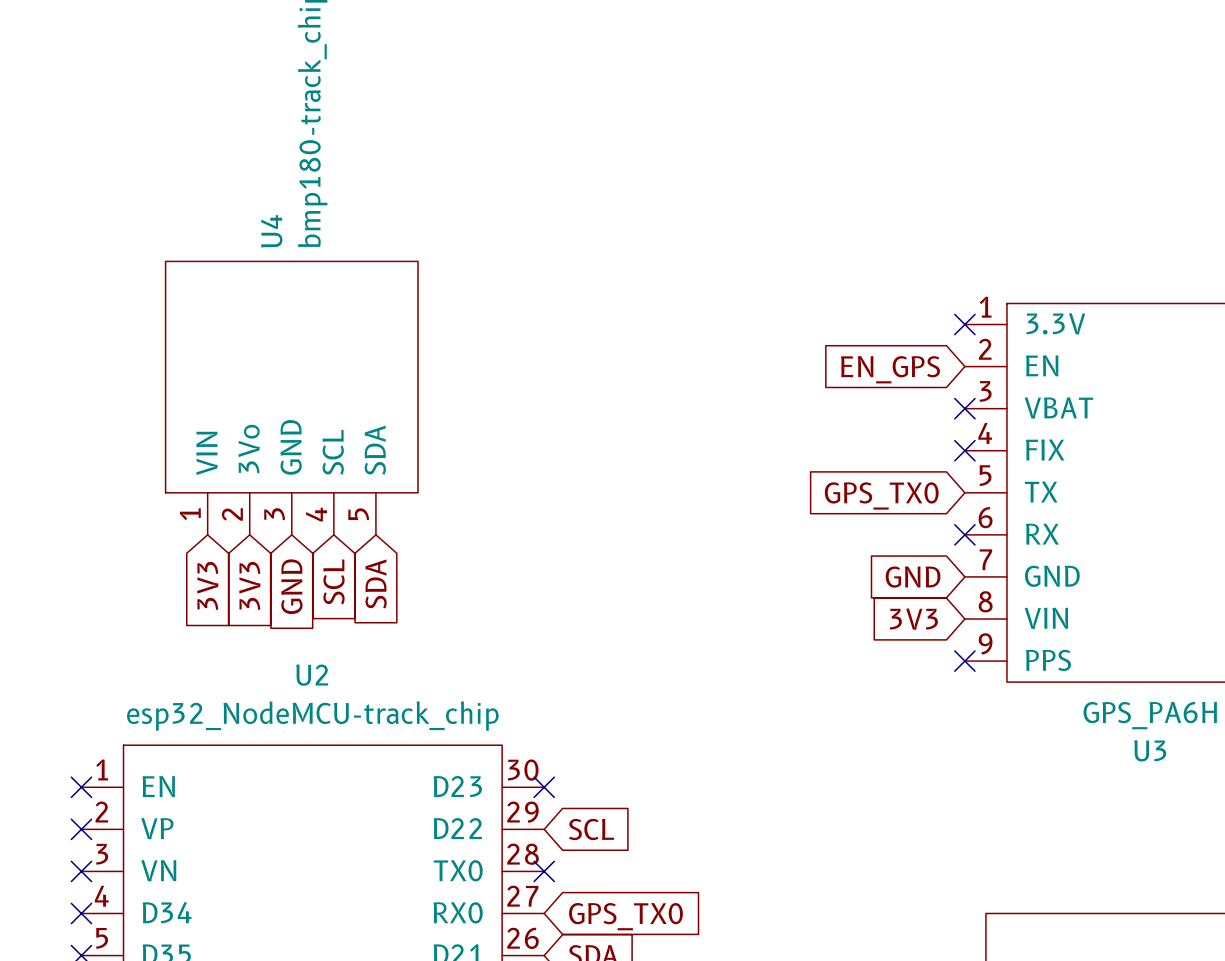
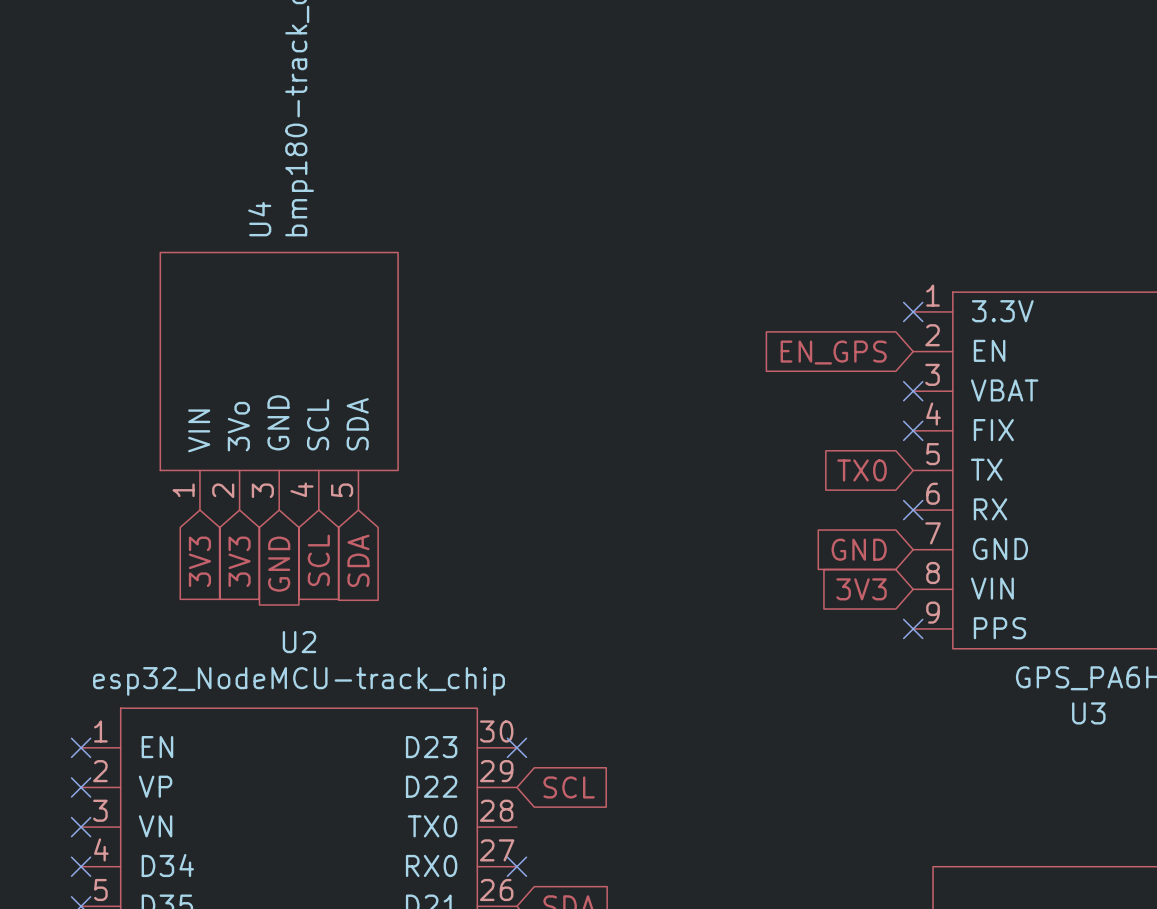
global label: GPS_TX0 (881, 495) -> TX0 (861, 470)
no-connect mark position: (544, 871) -> (516, 866)
global label: GPS_TX0 (625, 916) -> none

